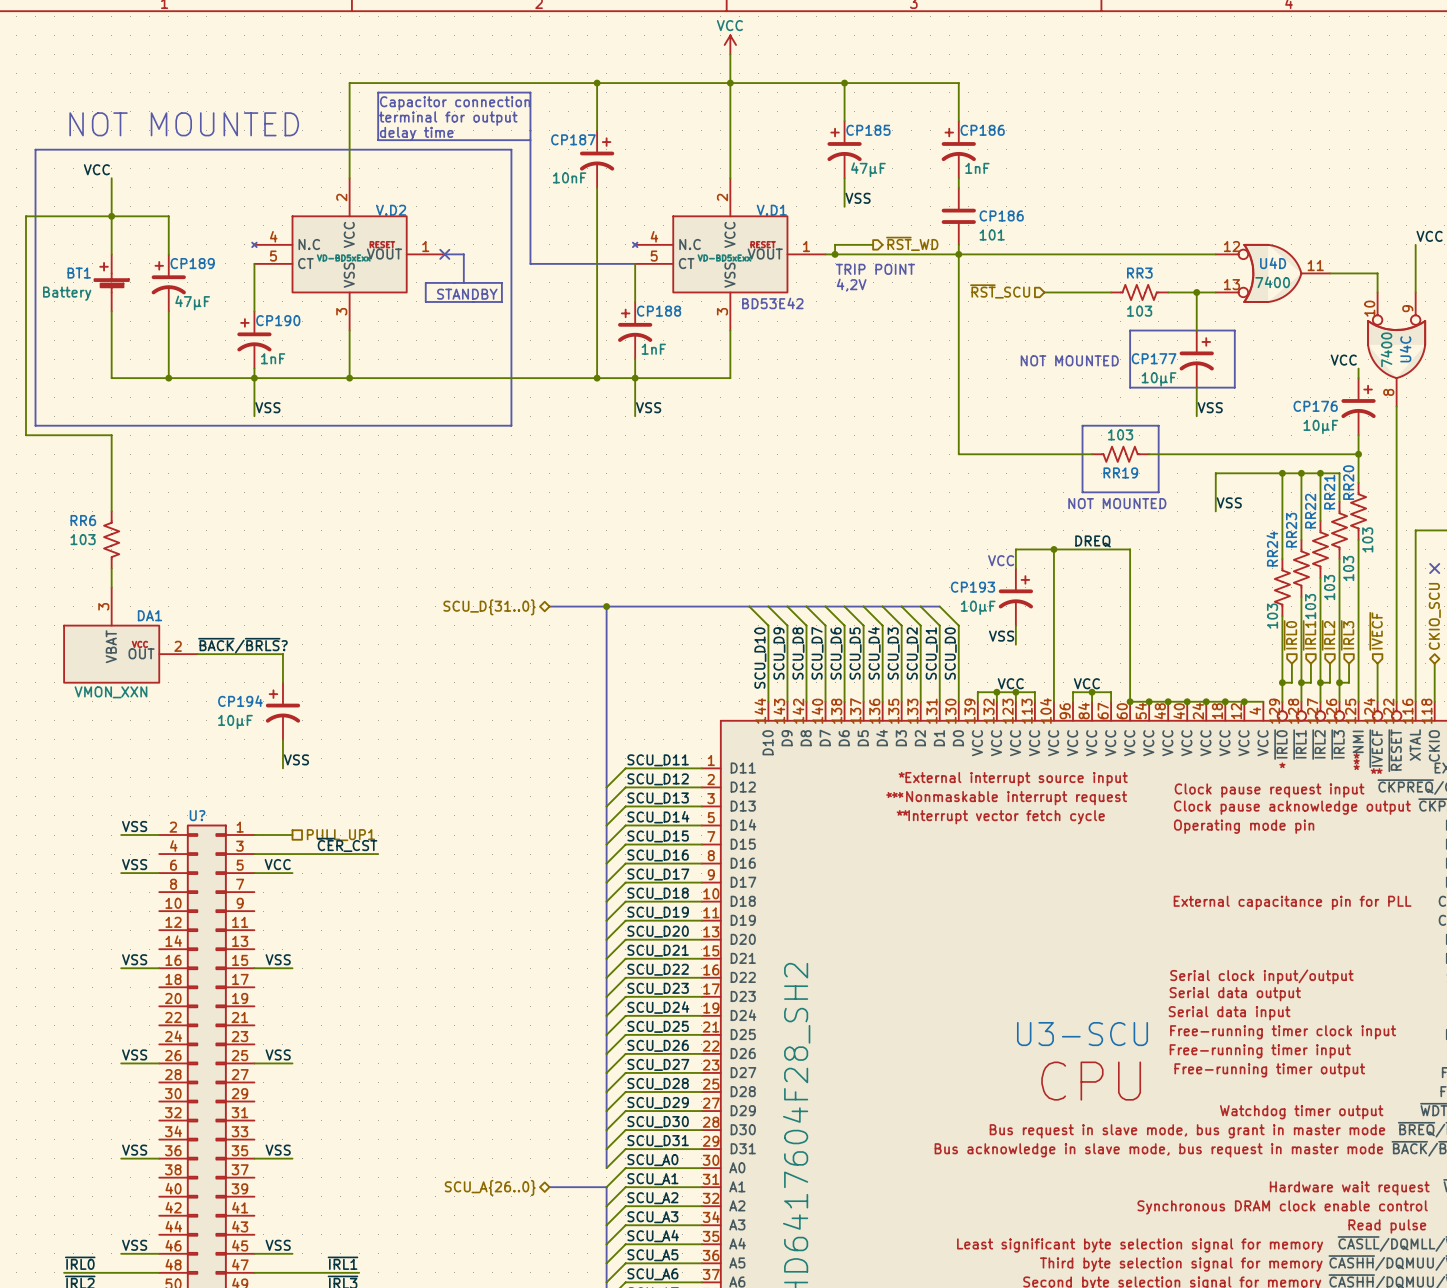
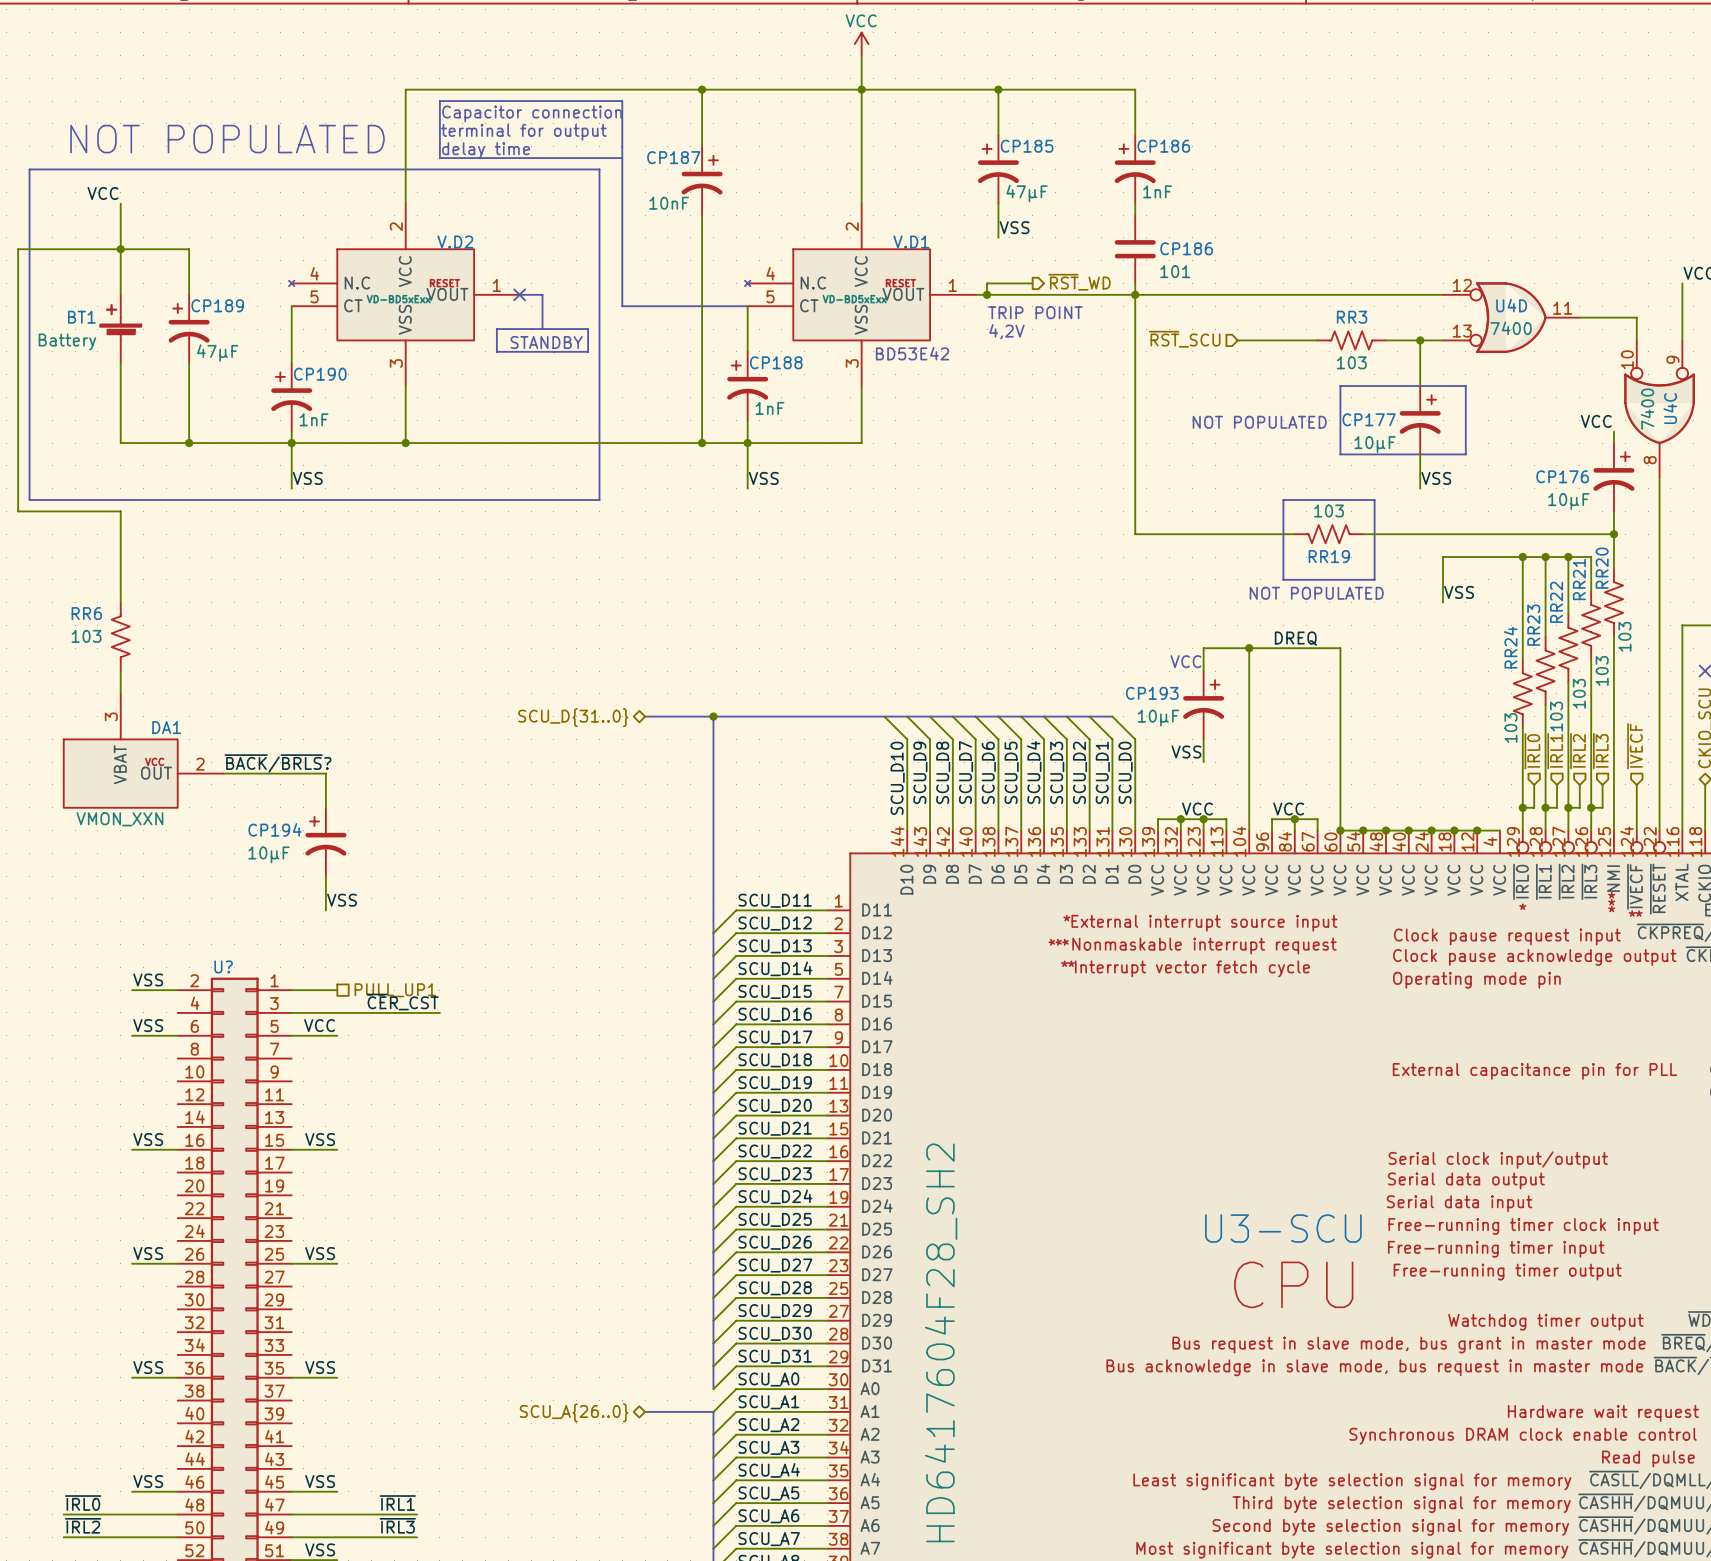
text: NOT MOUNTED (184, 124) -> NOT POPULATED (227, 139)
text: NOT MOUNTED (1069, 360) -> NOT POPULATED (1259, 422)
text: NOT MOUNTED (1117, 503) -> NOT POPULATED (1316, 593)

